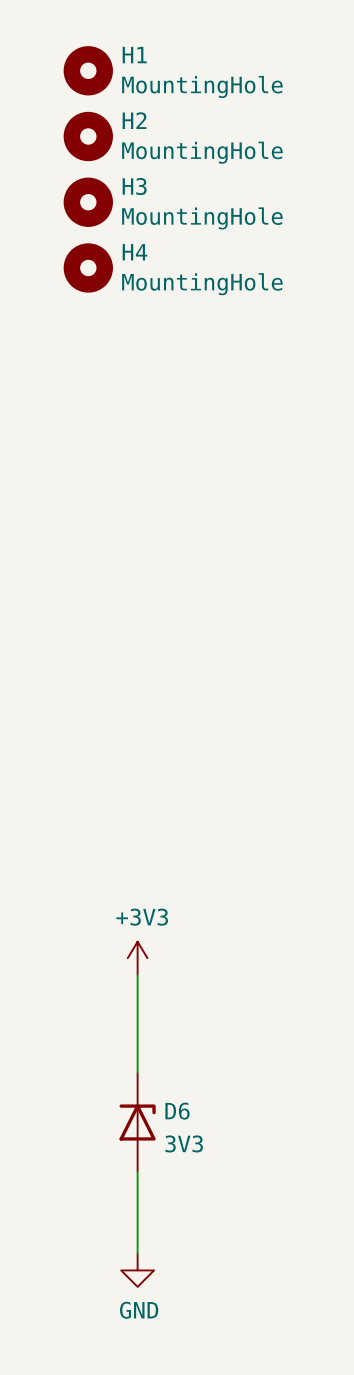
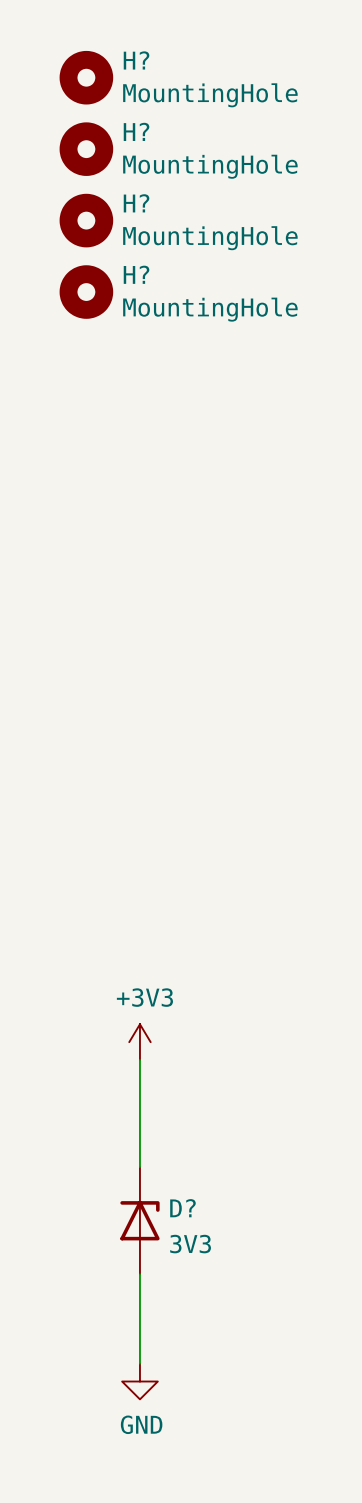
H1 name: H1 (134, 55) -> H? (136, 60)
H2 name: H2 (134, 120) -> H? (136, 131)
H3 name: H3 (134, 186) -> H? (136, 203)
H4 name: H4 (134, 252) -> H? (136, 274)
D6 name: D6 (177, 1111) -> D? (182, 1208)

